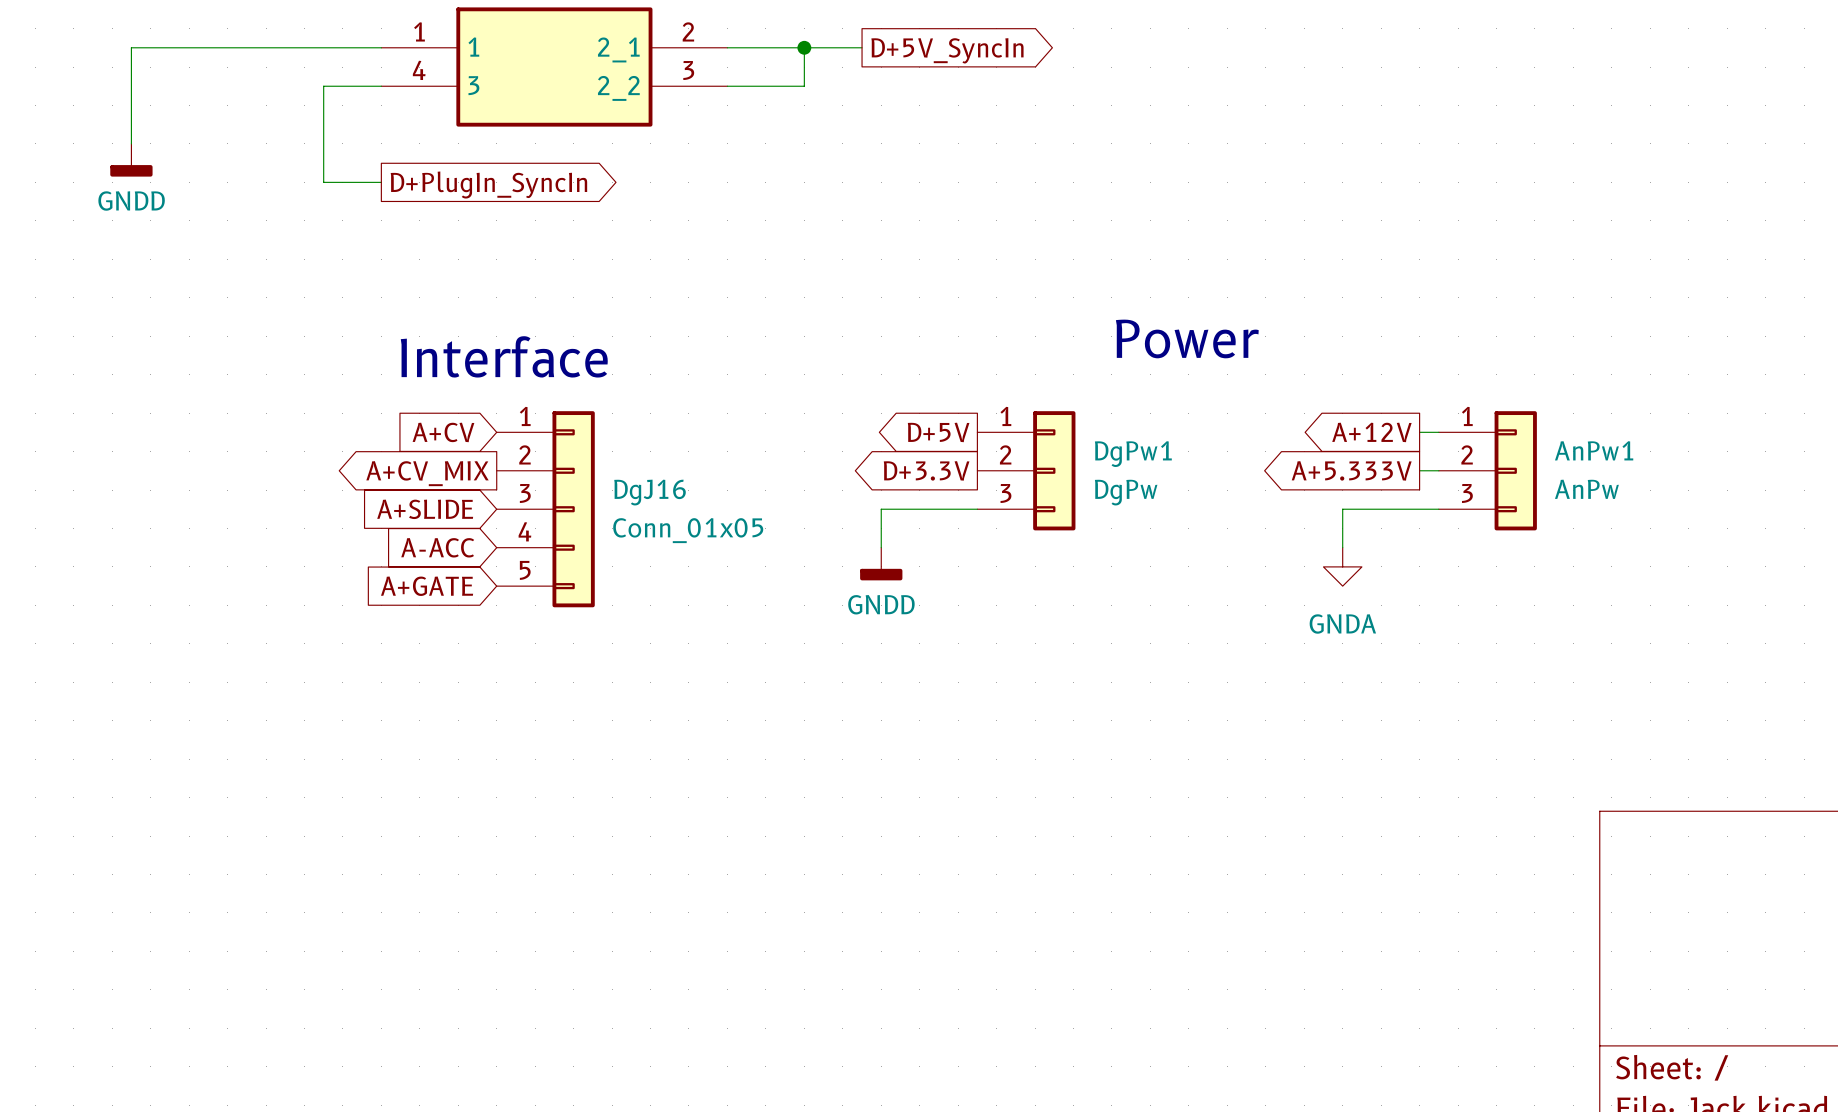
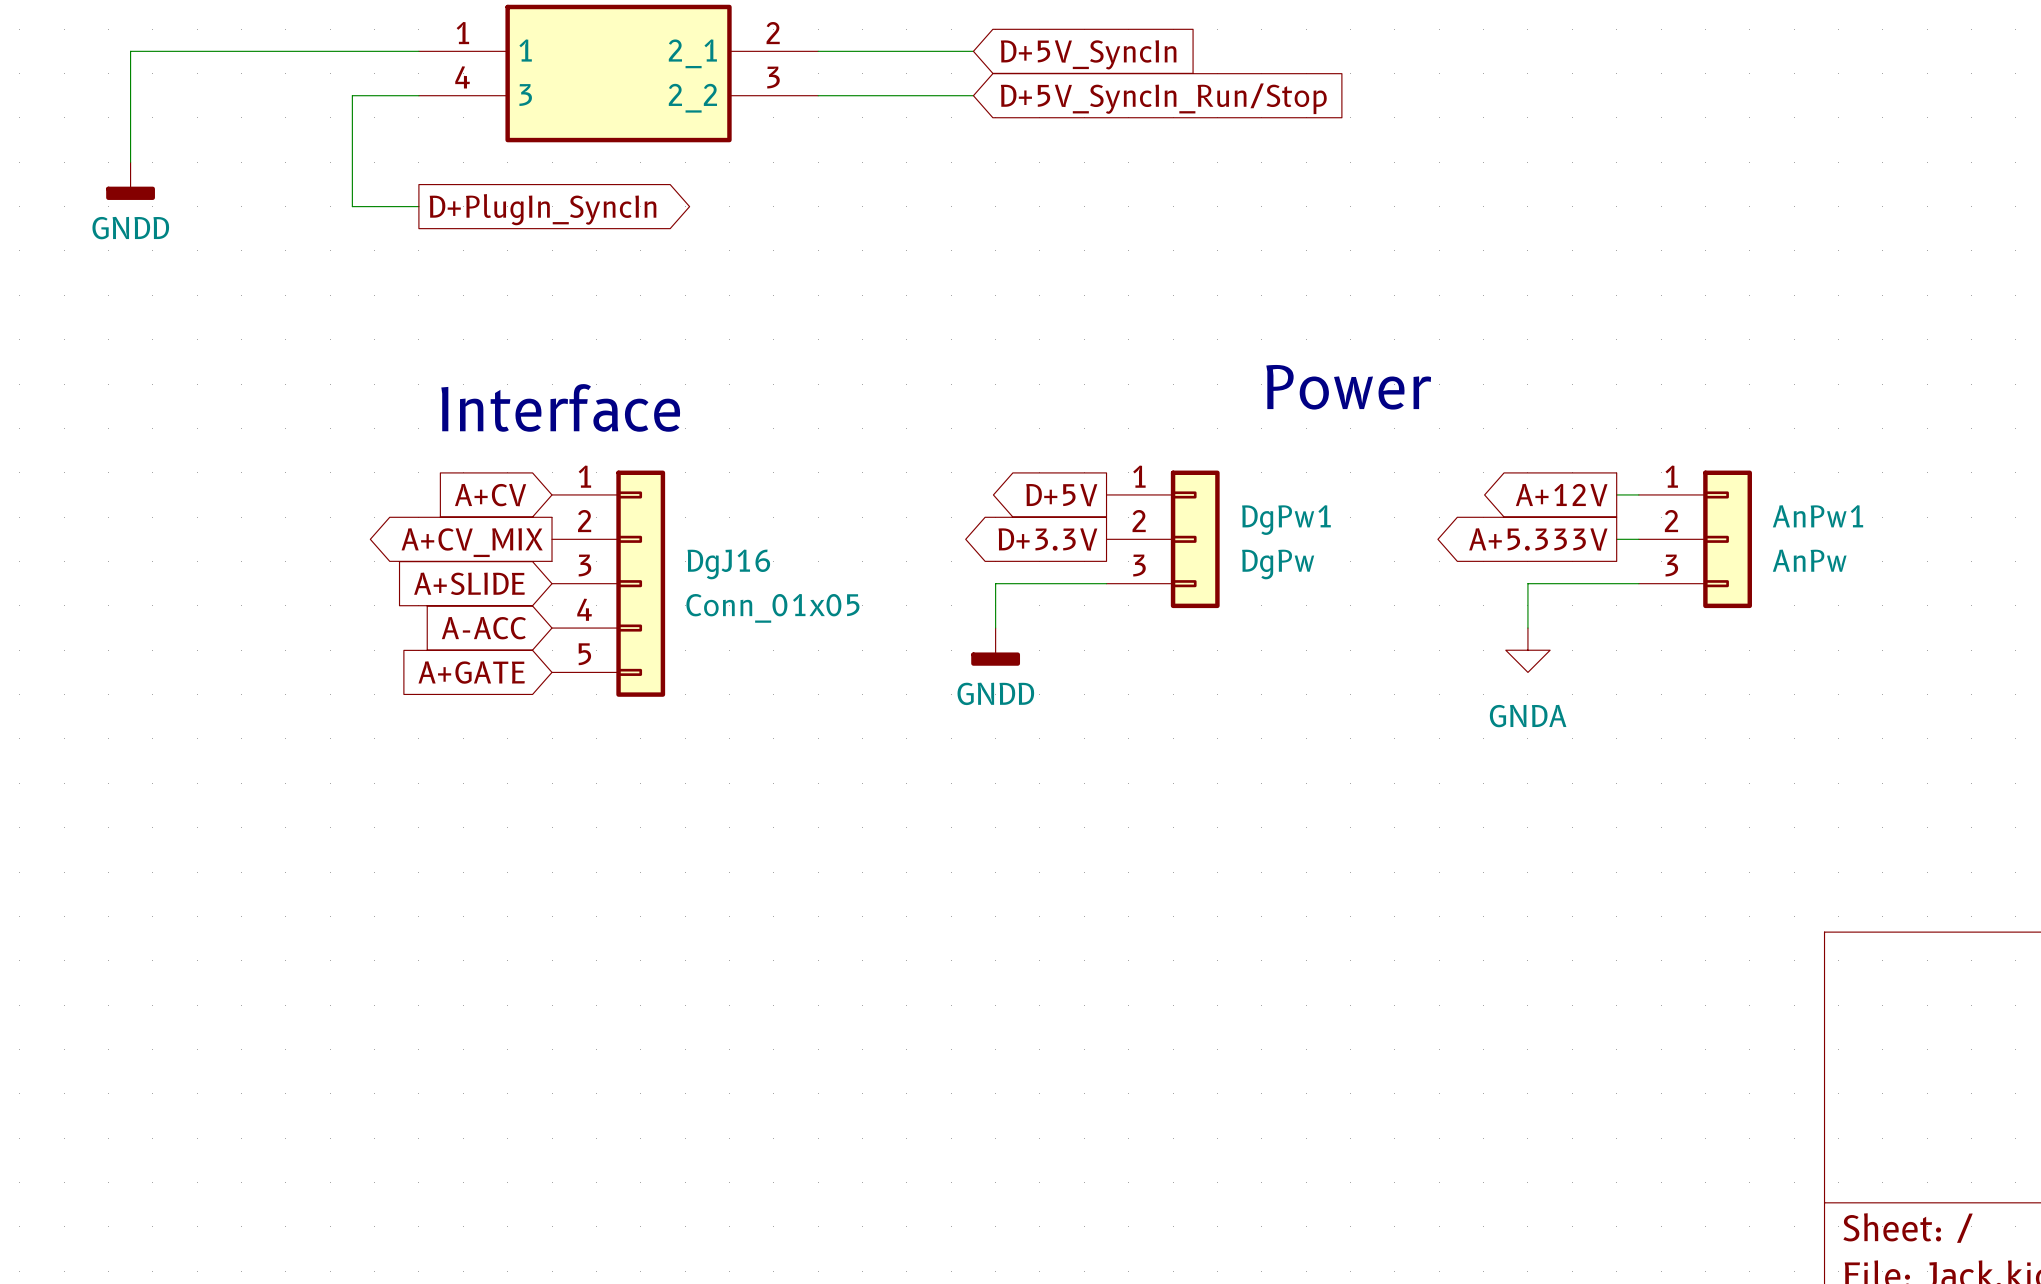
wire: (804, 47) (804, 86) -> (973, 95) (906, 95)
junction: (804, 47) -> none
global label shape: output (947, 50) -> input (1088, 54)
global label: none -> D+5V_SyncIn_Run/Stop (1163, 98)

